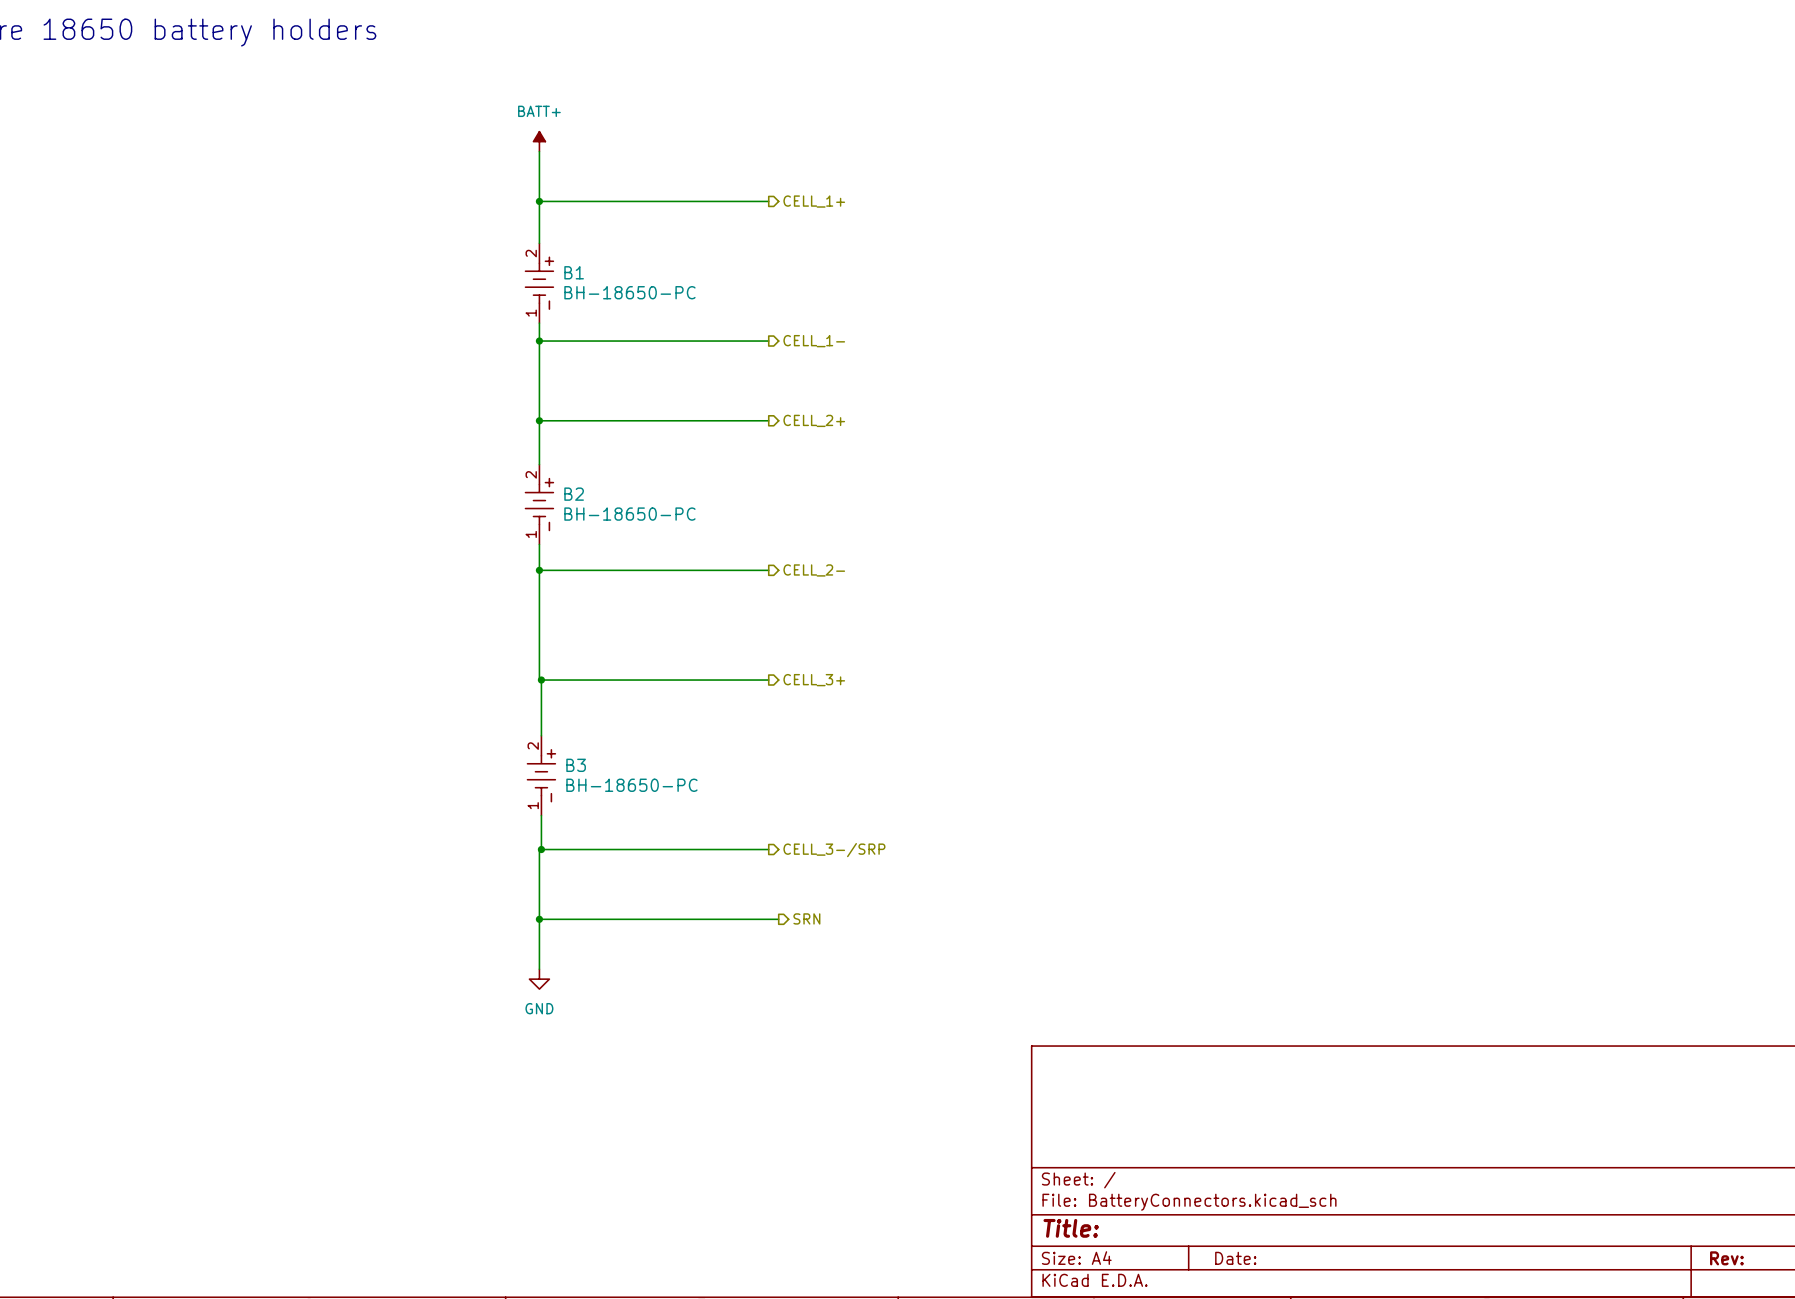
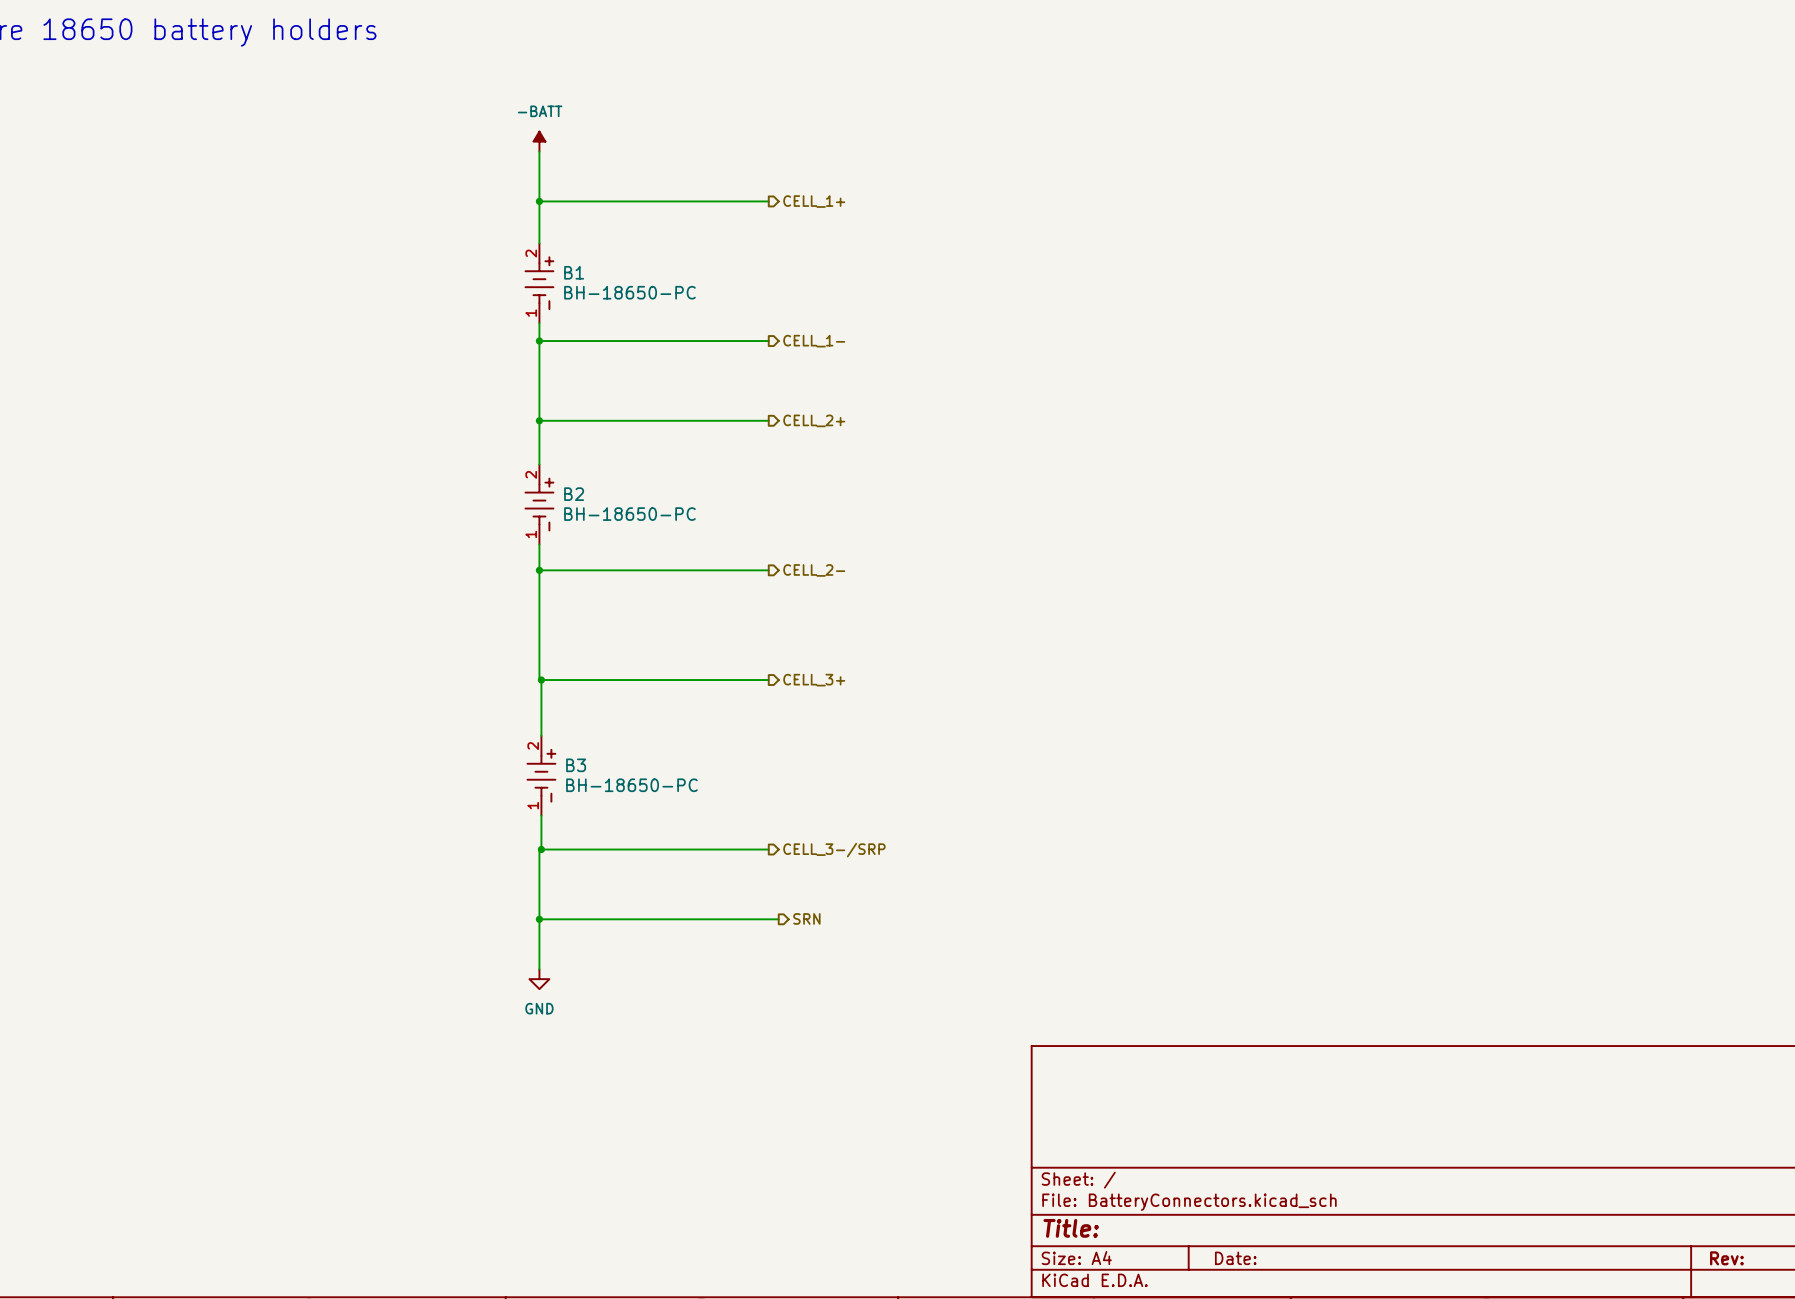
power symbol: BATT+ (539, 141) -> -BATT (539, 141)

